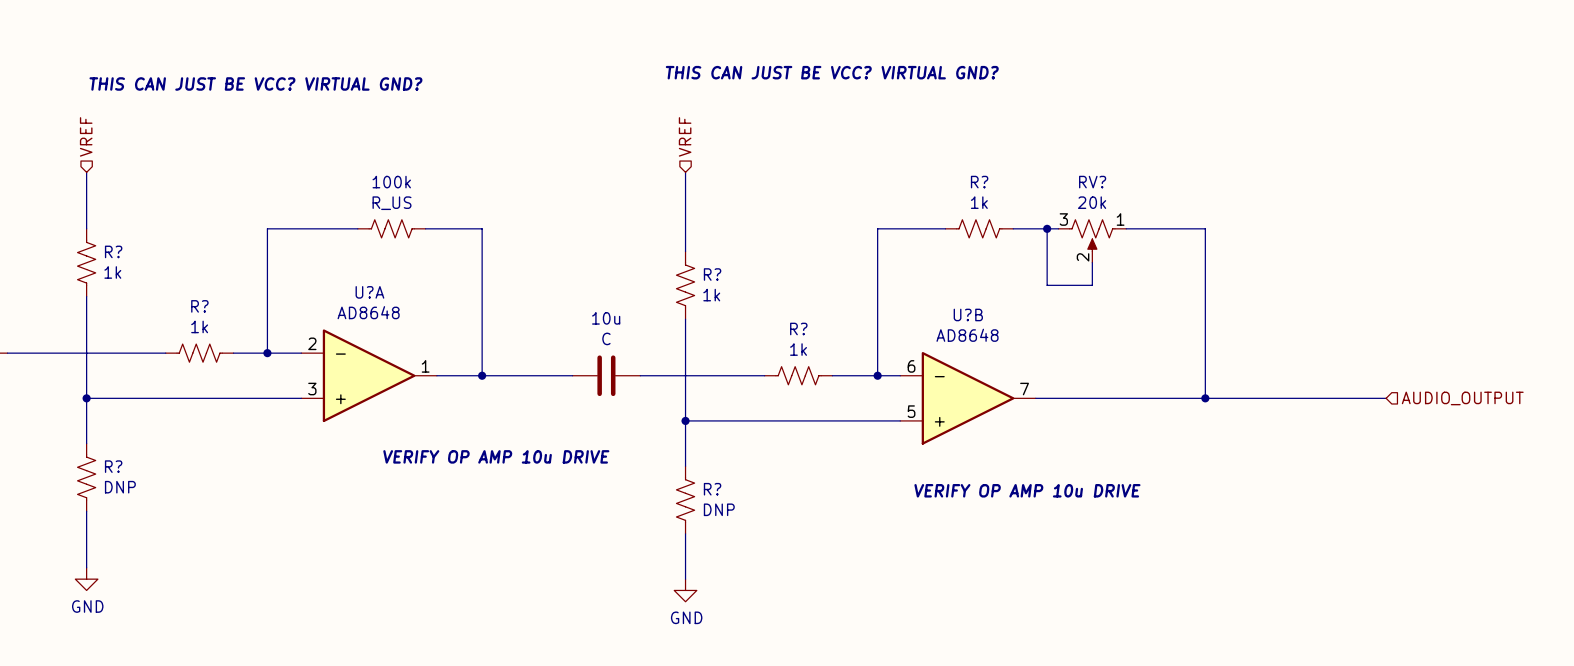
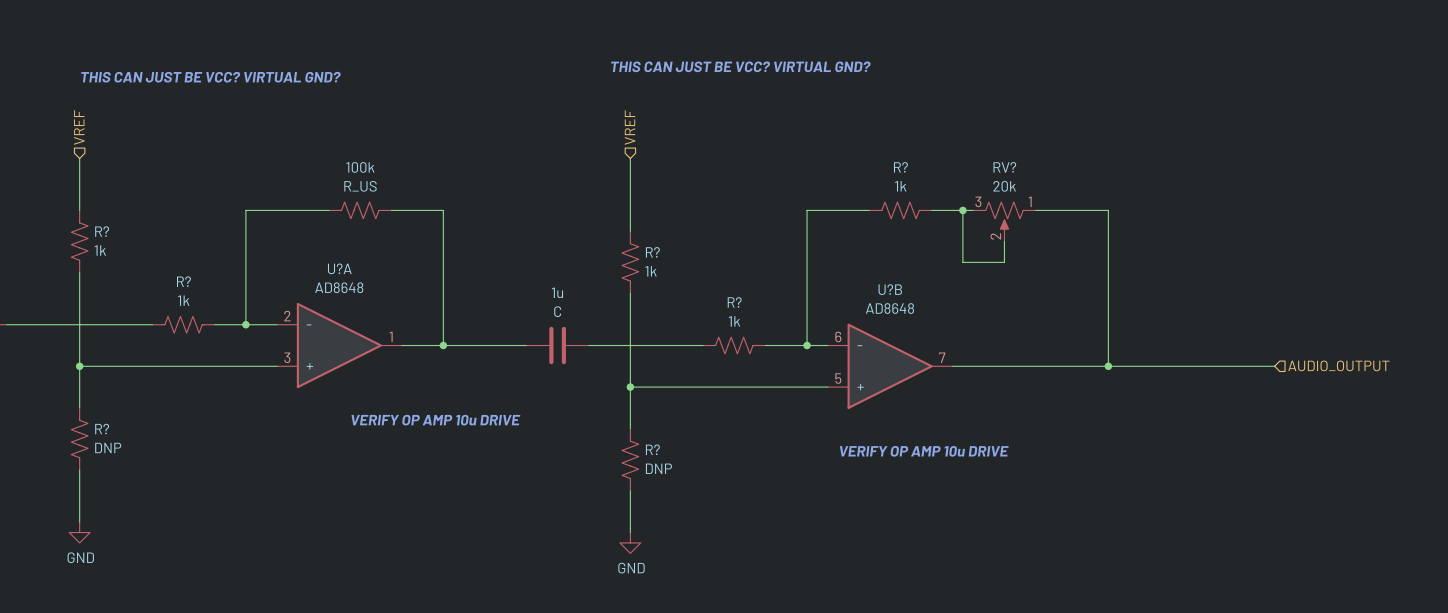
10u name: 10u (606, 318) -> 1u (557, 292)

